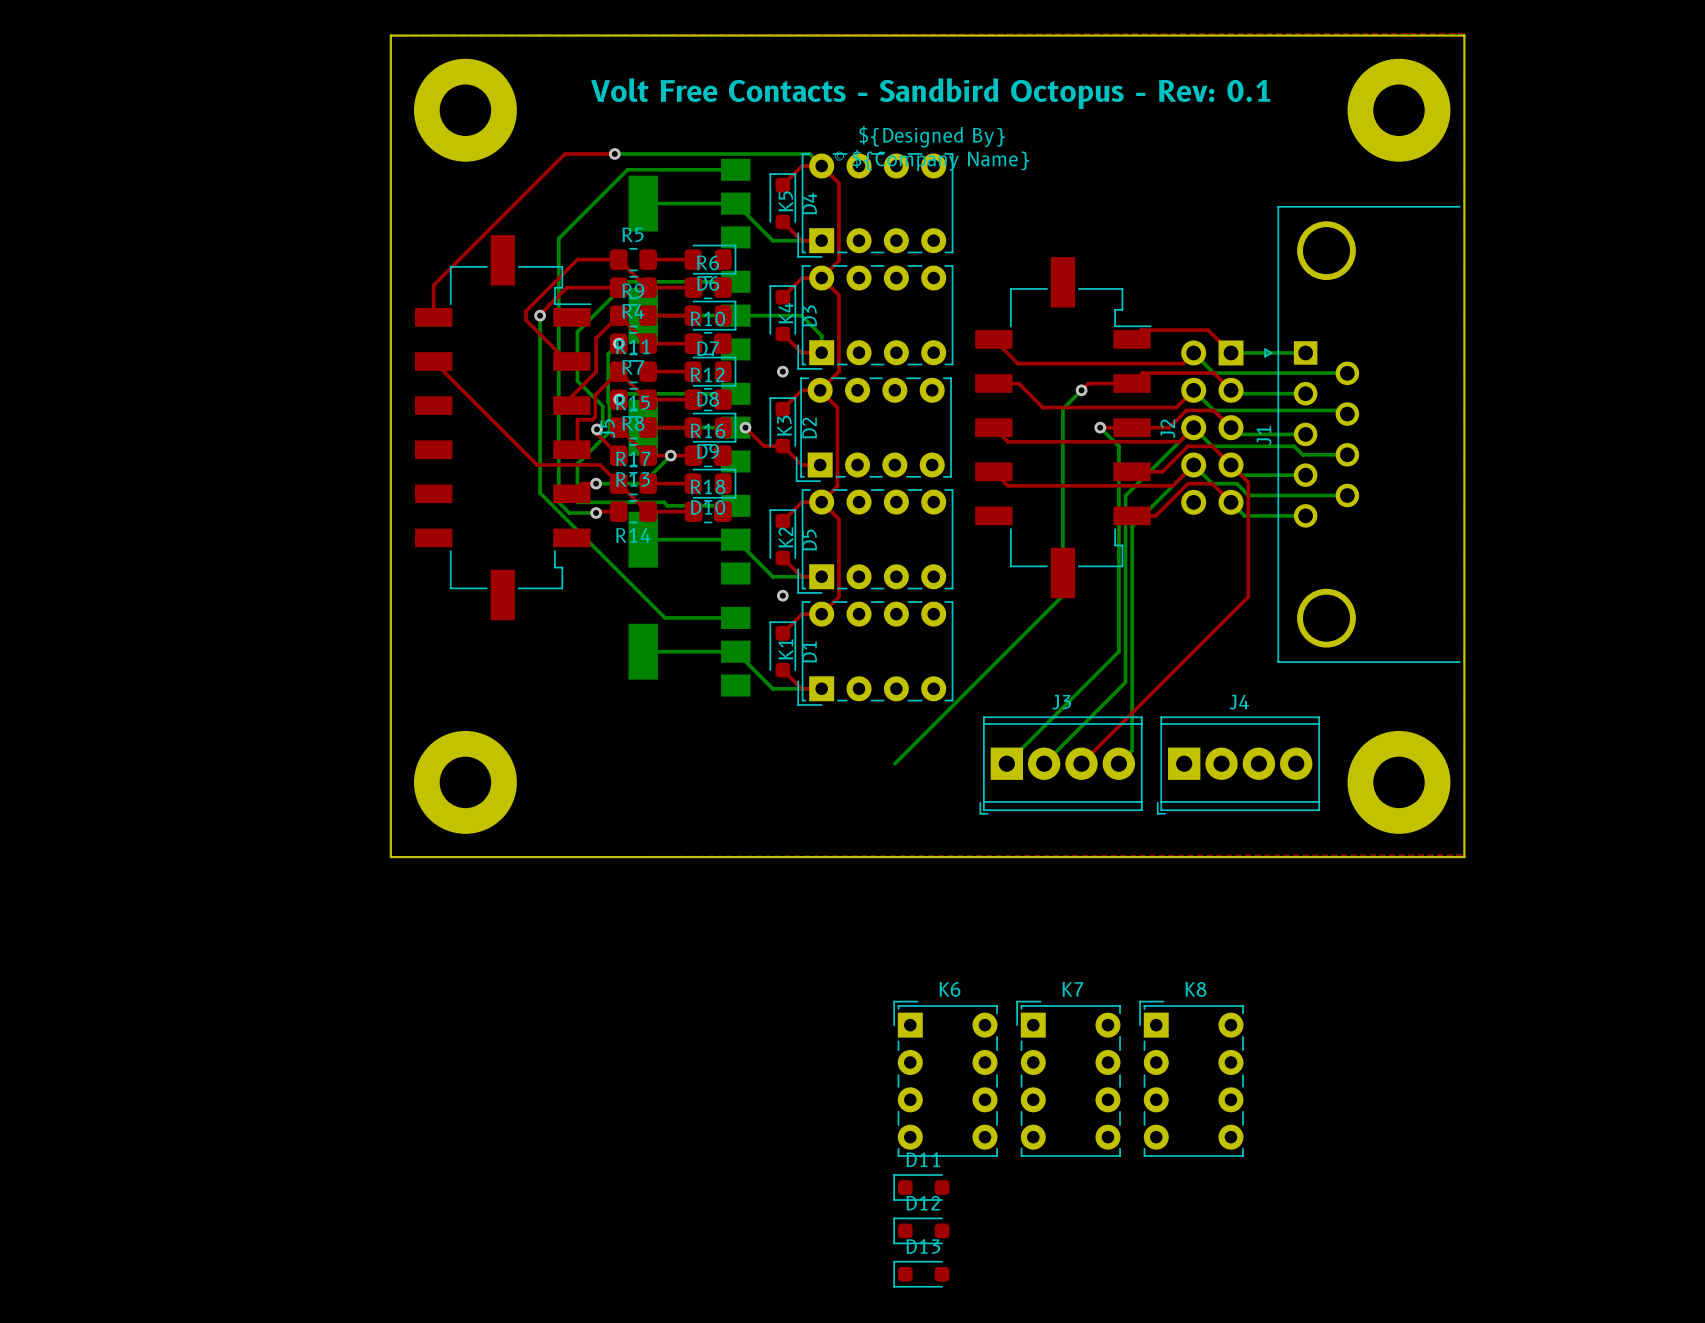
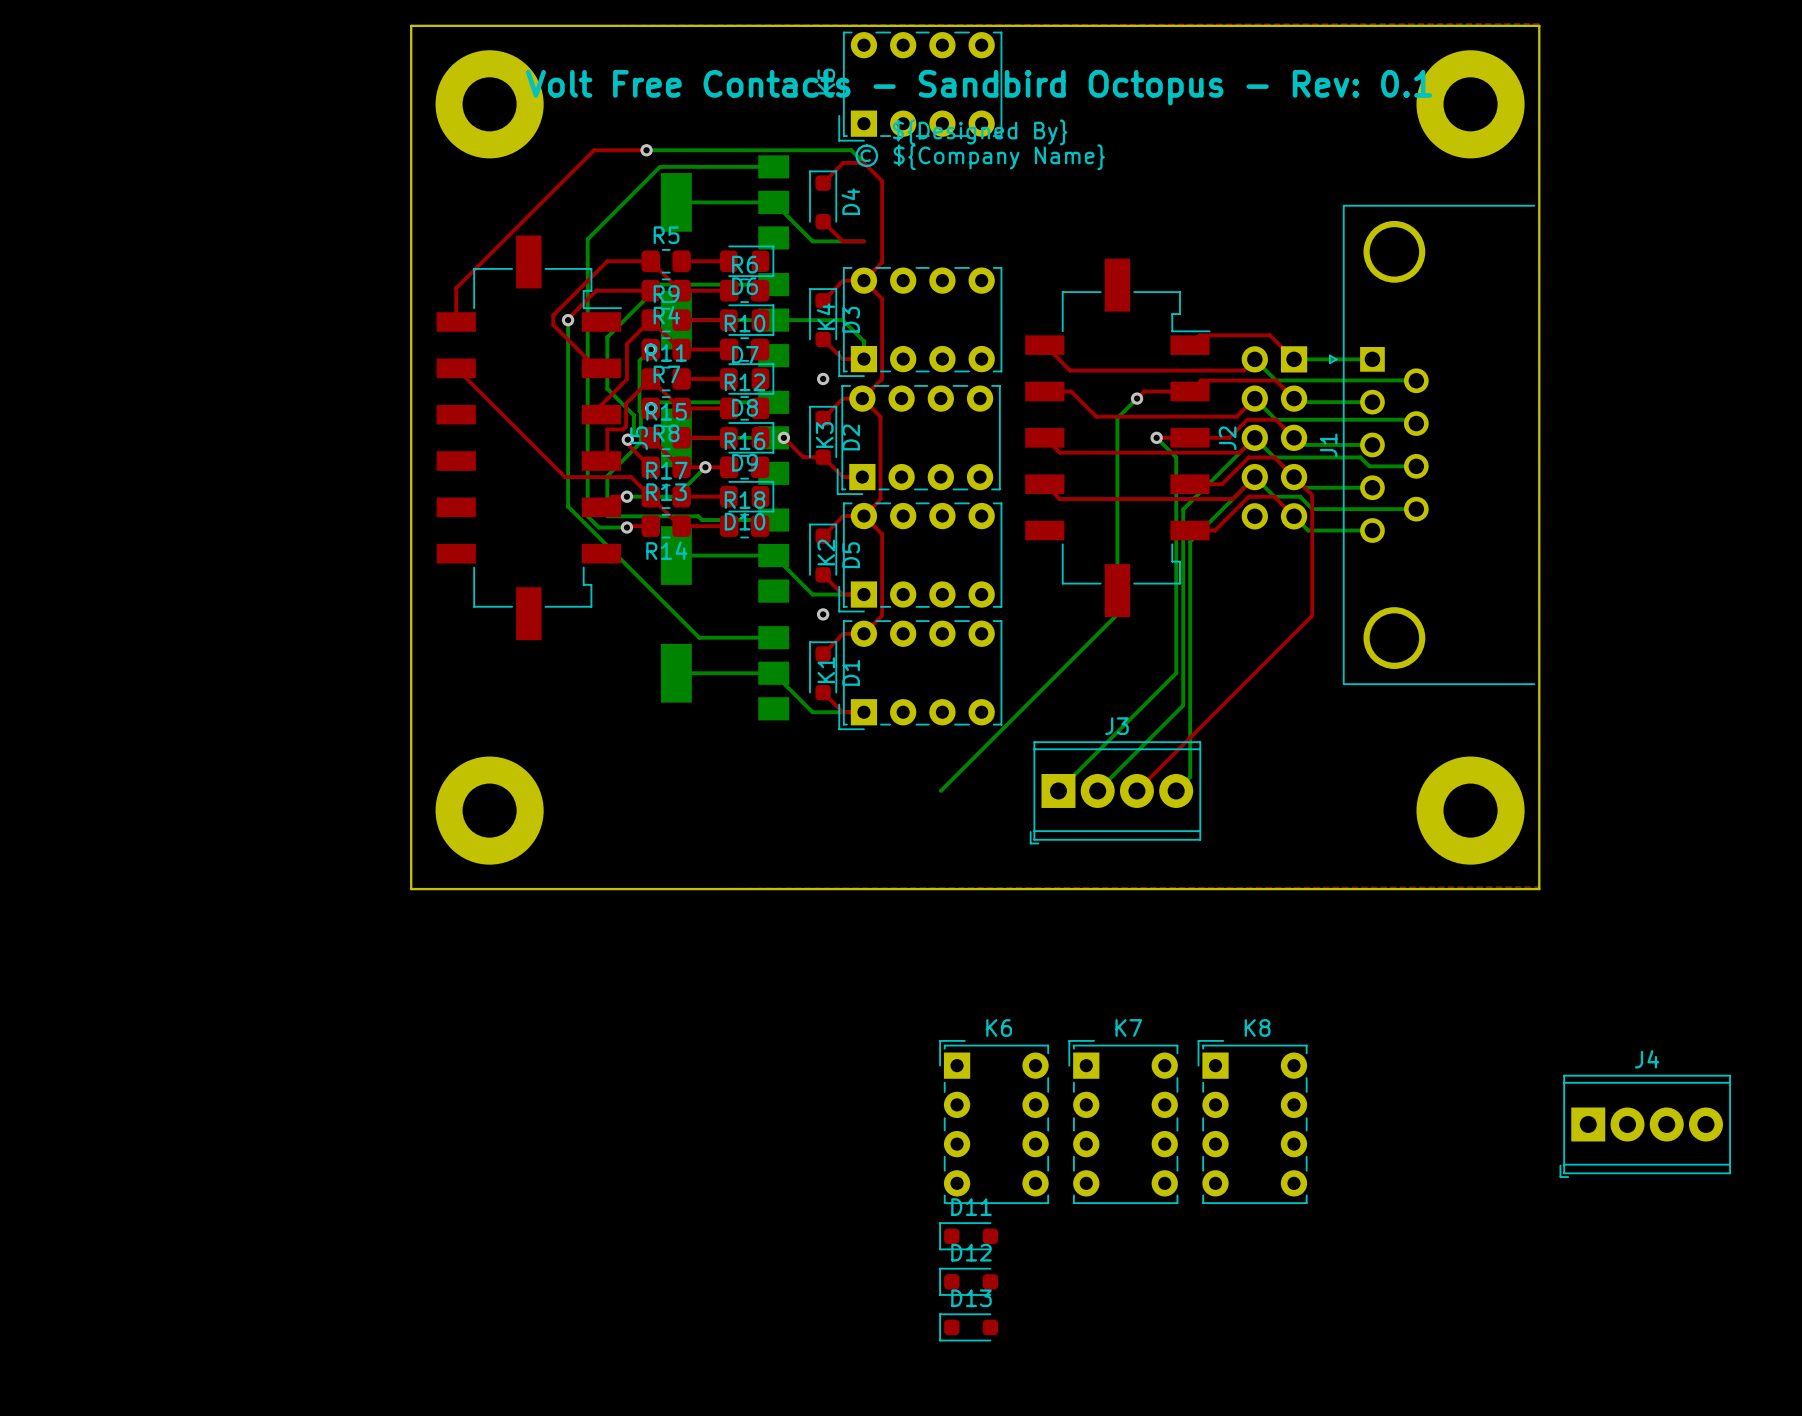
K5 position: (875, 205) -> (920, 86)
J4 position: (1238, 765) -> (1645, 1126)

